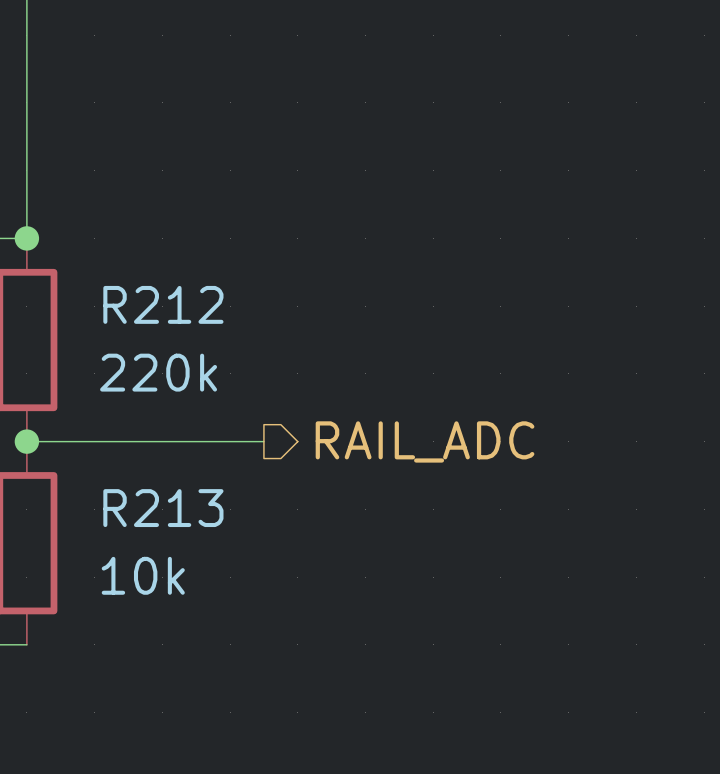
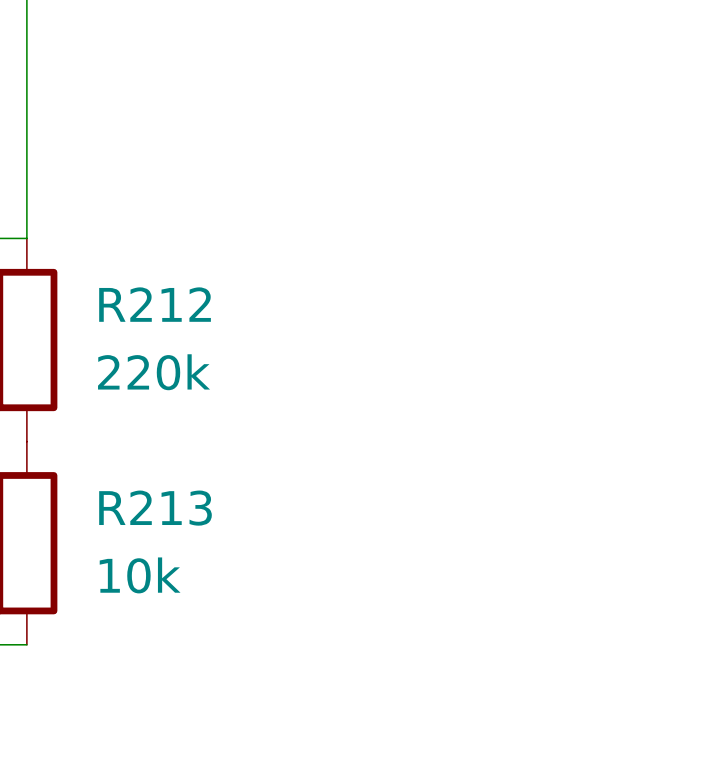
junction: (26, 238) -> none
wire: (26, 441) (263, 441) -> none
junction: (26, 441) -> none
hierarchical label: RAIL_ADC (425, 441) -> none

